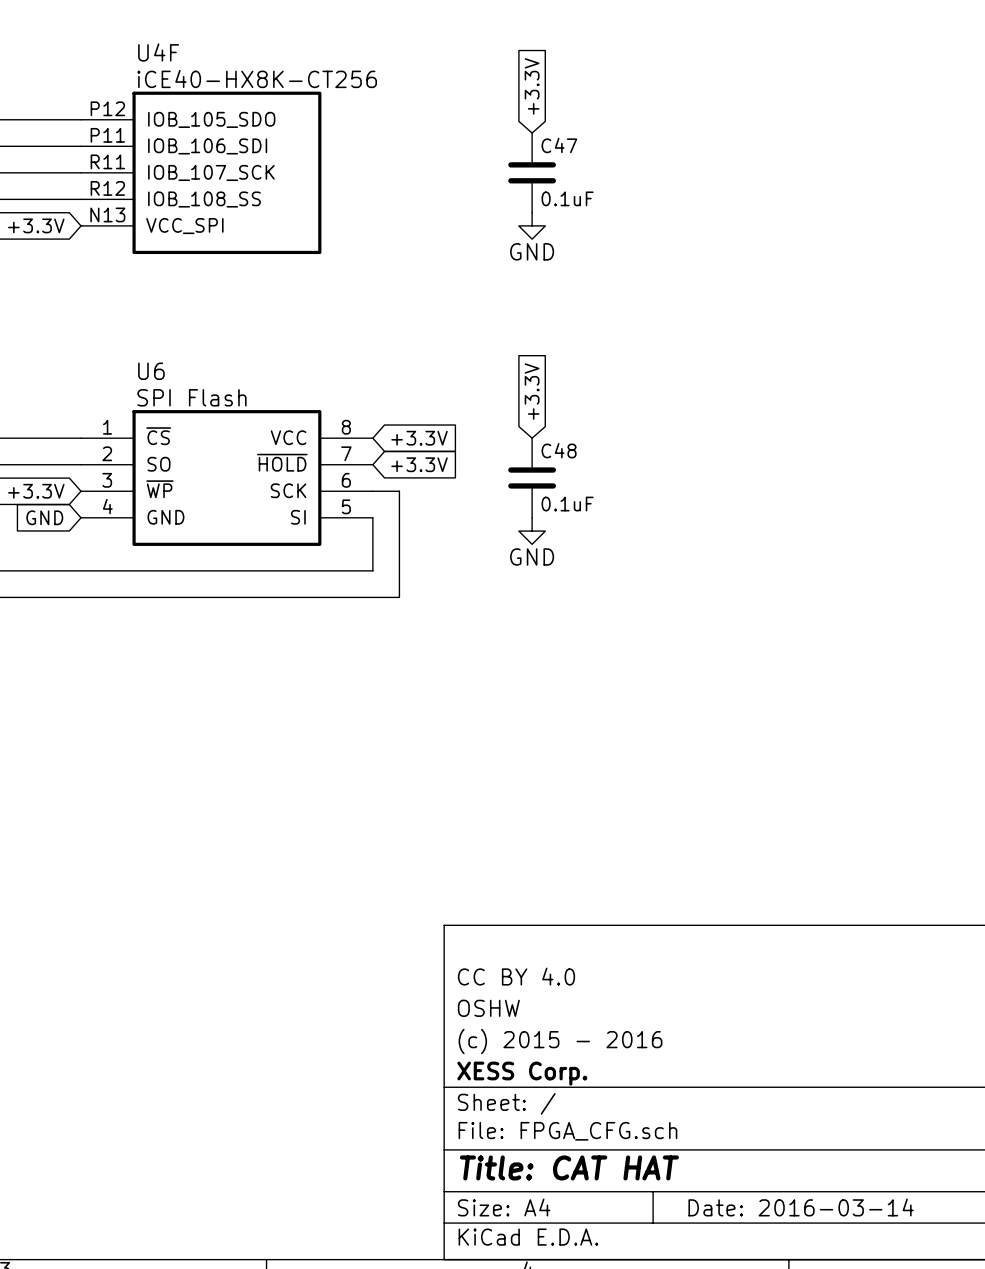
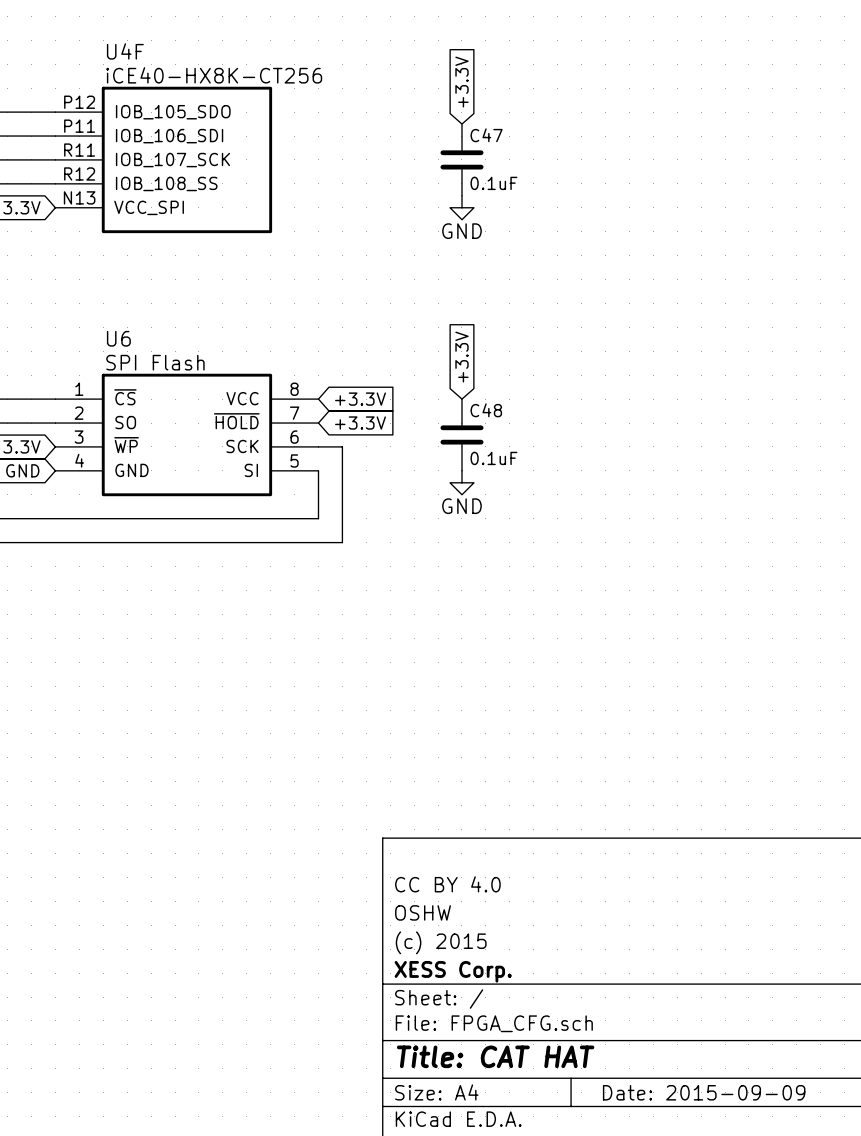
title block: (c) 2015 - 2016 (560, 1041) -> (c) 2015 (441, 942)
title block: Date: 2016-03-14 (801, 1207) -> Date: 2015-09-09 (704, 1092)

